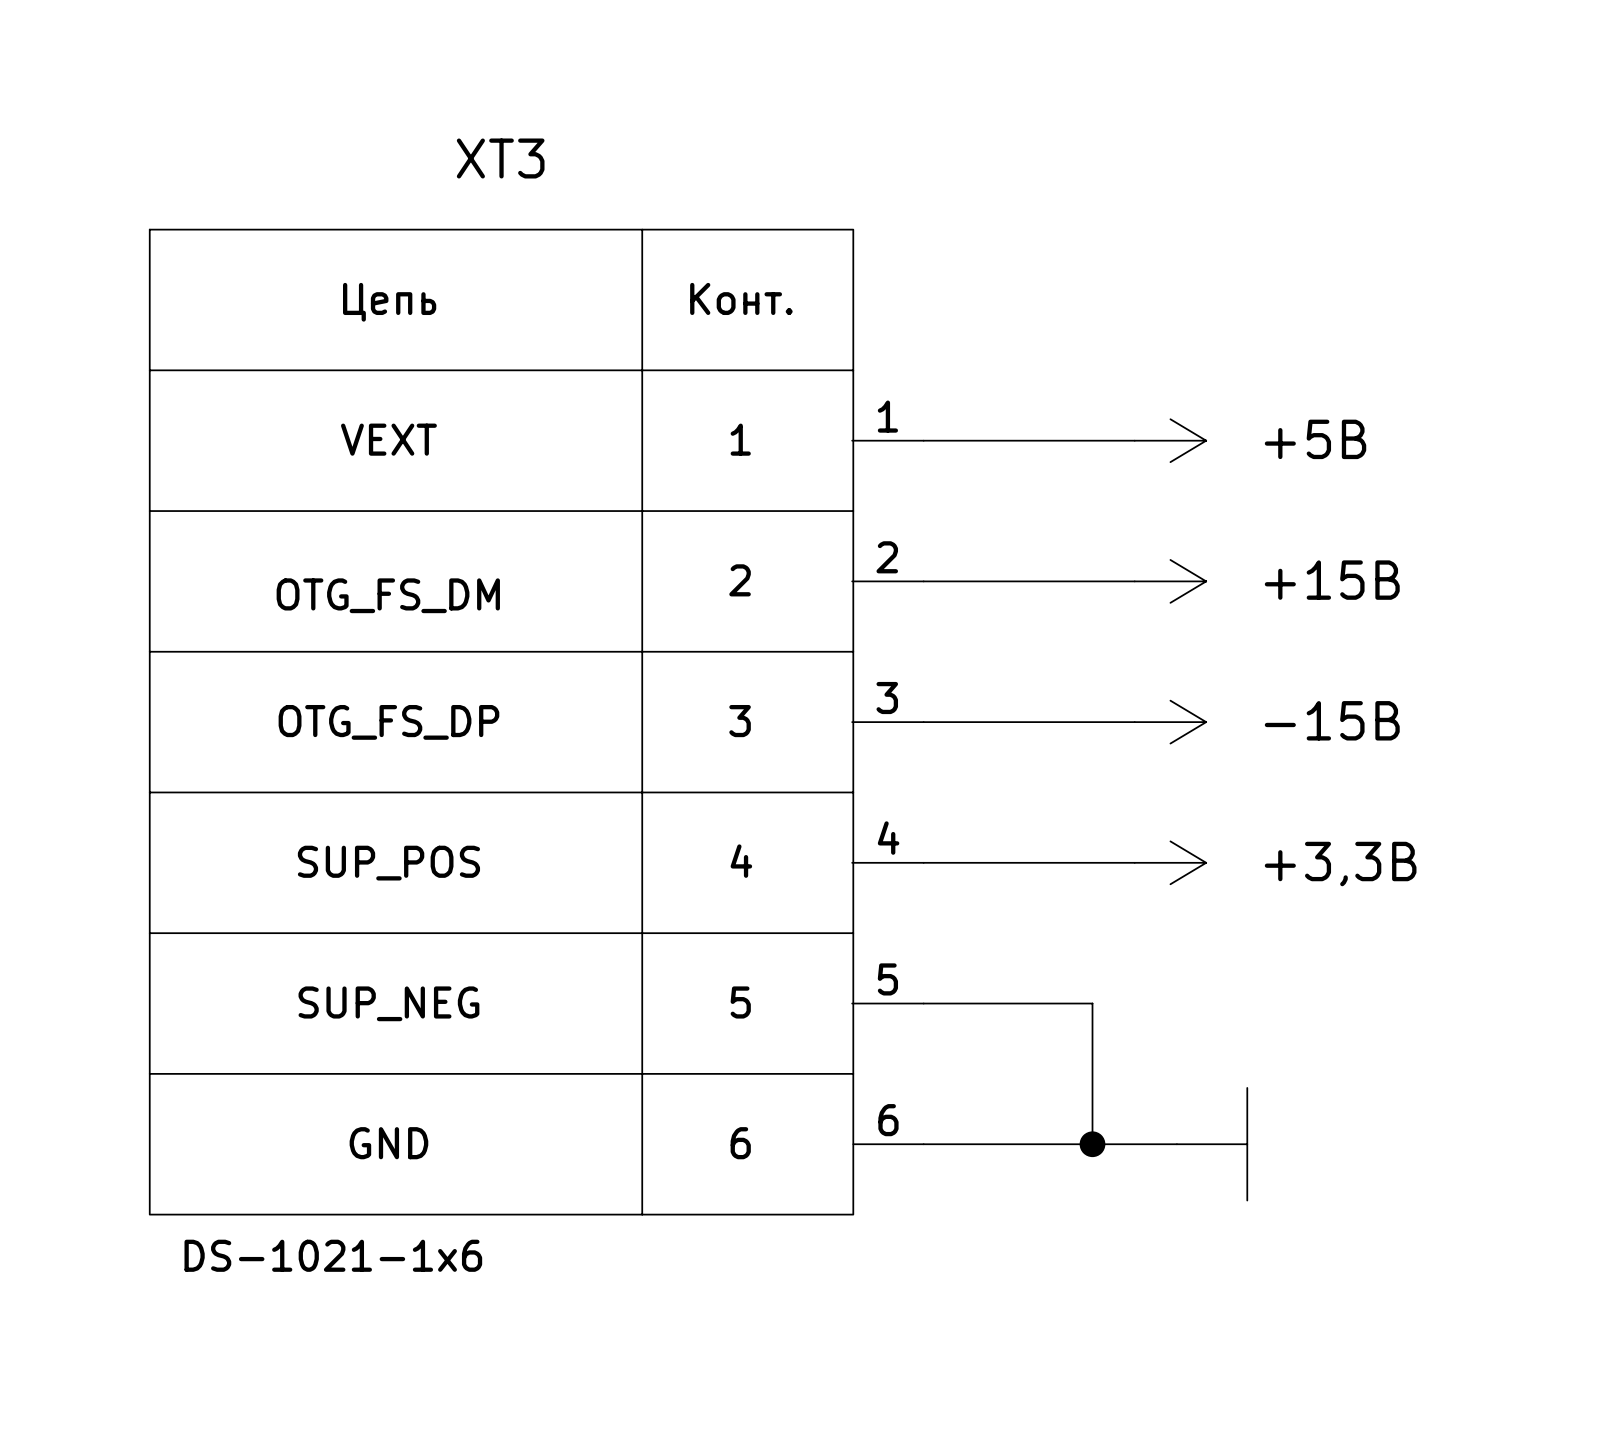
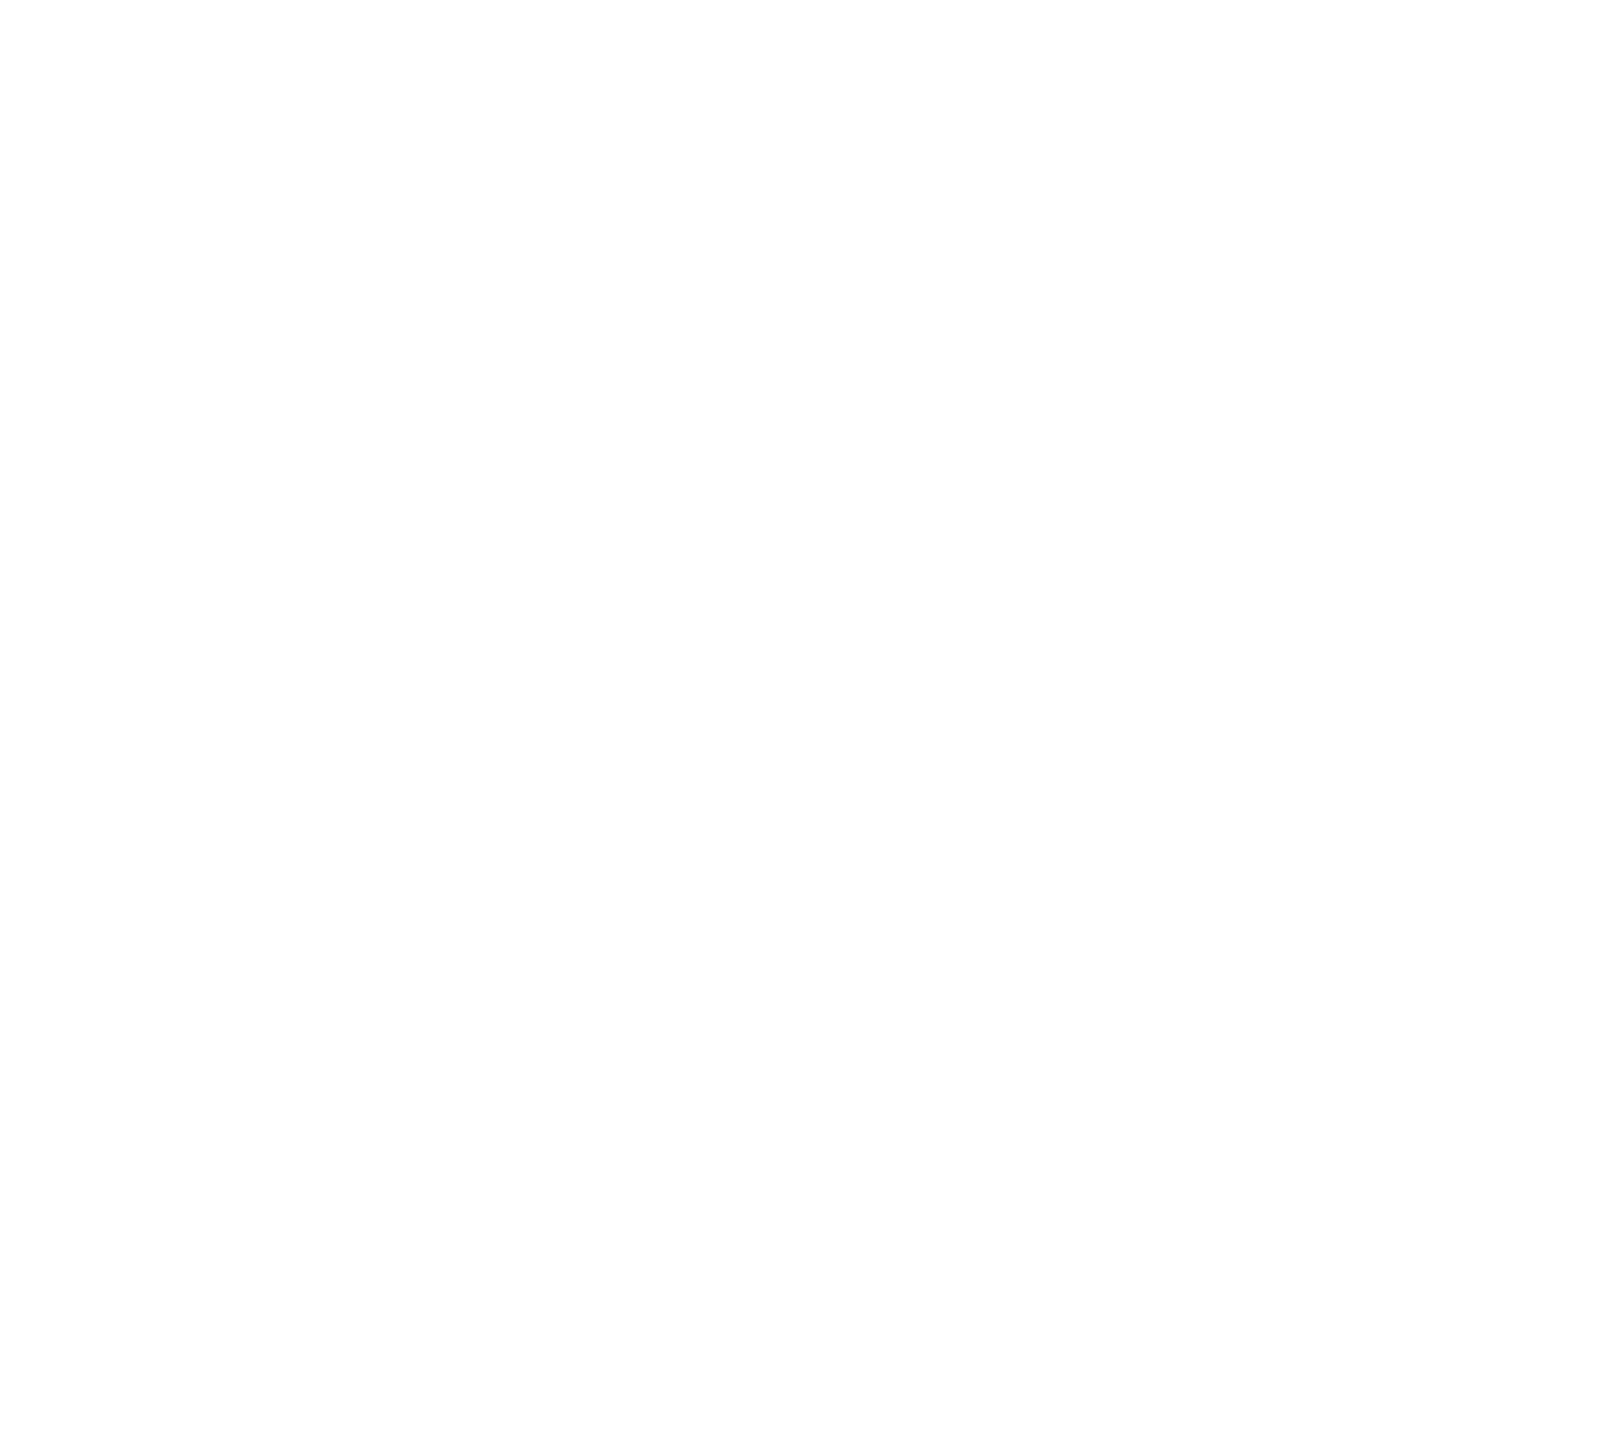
wire: (923, 440) (1134, 440) -> none
power symbol: +5B (1170, 440) -> none
wire: (923, 581) (1134, 581) -> none
power symbol: +15B (1170, 581) -> none
XT3: (536, 722) -> none
wire: (923, 722) (1134, 722) -> none
power symbol: -15B (1170, 722) -> none
wire: (923, 862) (1134, 862) -> none
power symbol: +3,3B (1170, 862) -> none
wire: (923, 1003) (1092, 1003) (1092, 1144) -> none
wire: (923, 1144) (1176, 1144) -> none
junction: (1092, 1144) -> none
power symbol: (1212, 1144) -> none

